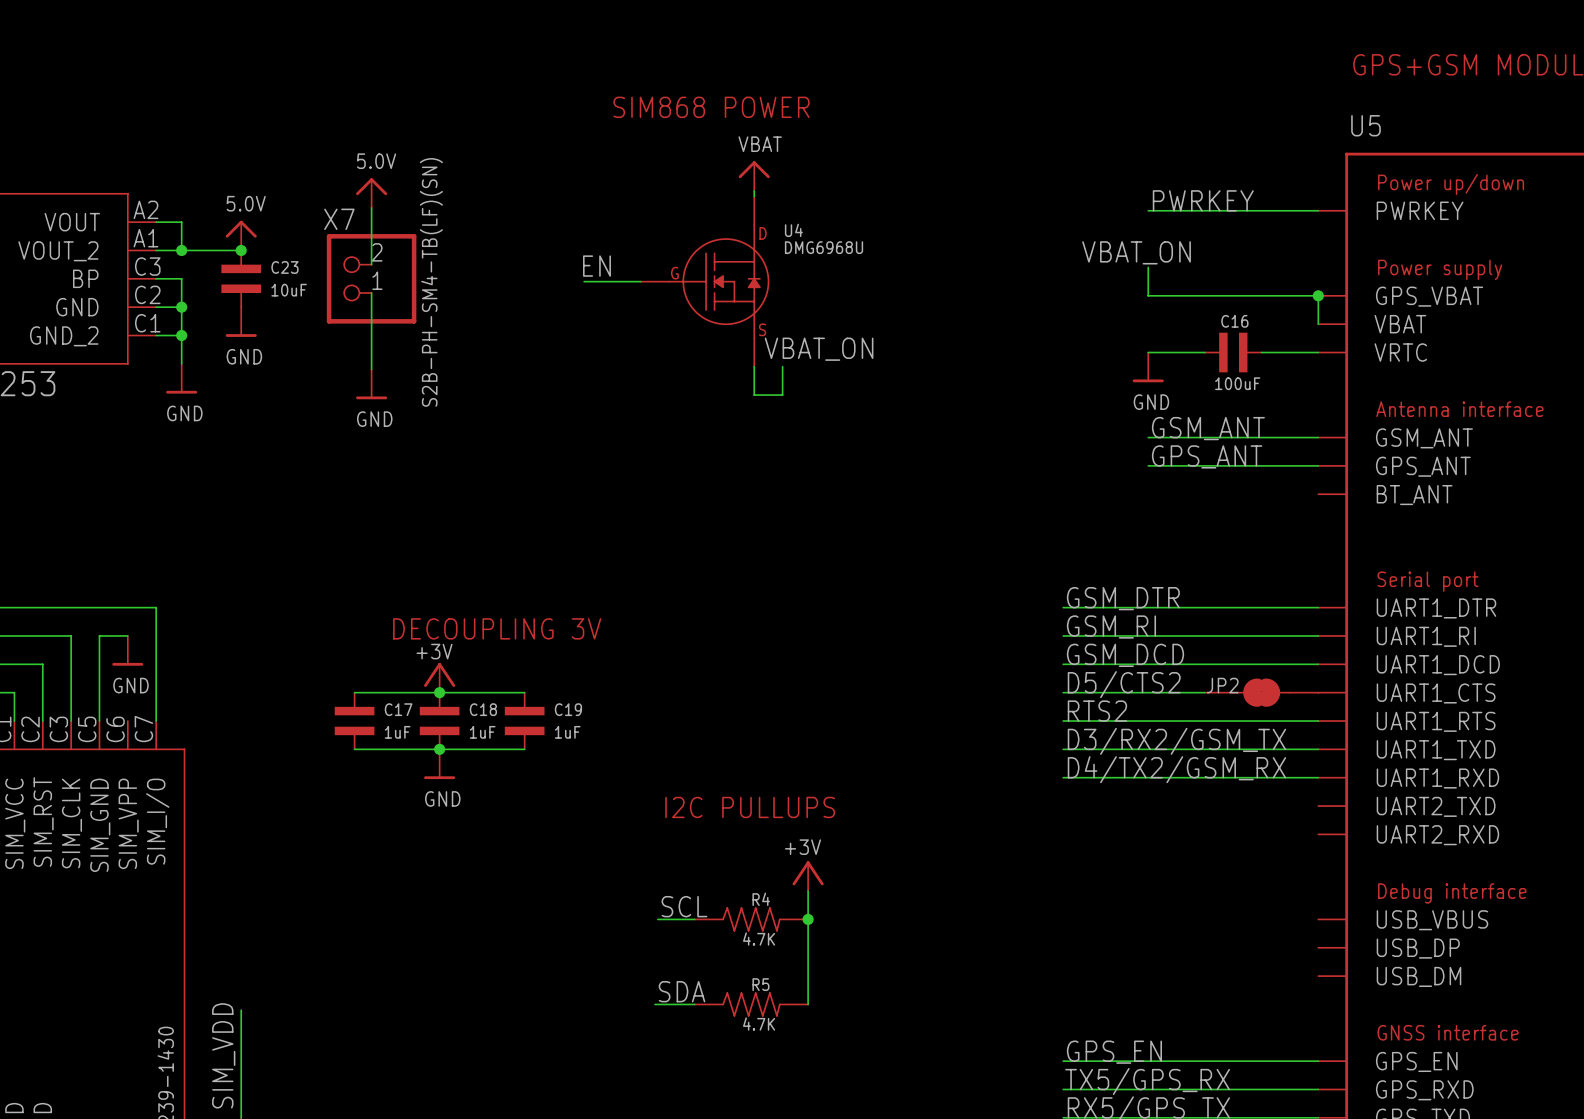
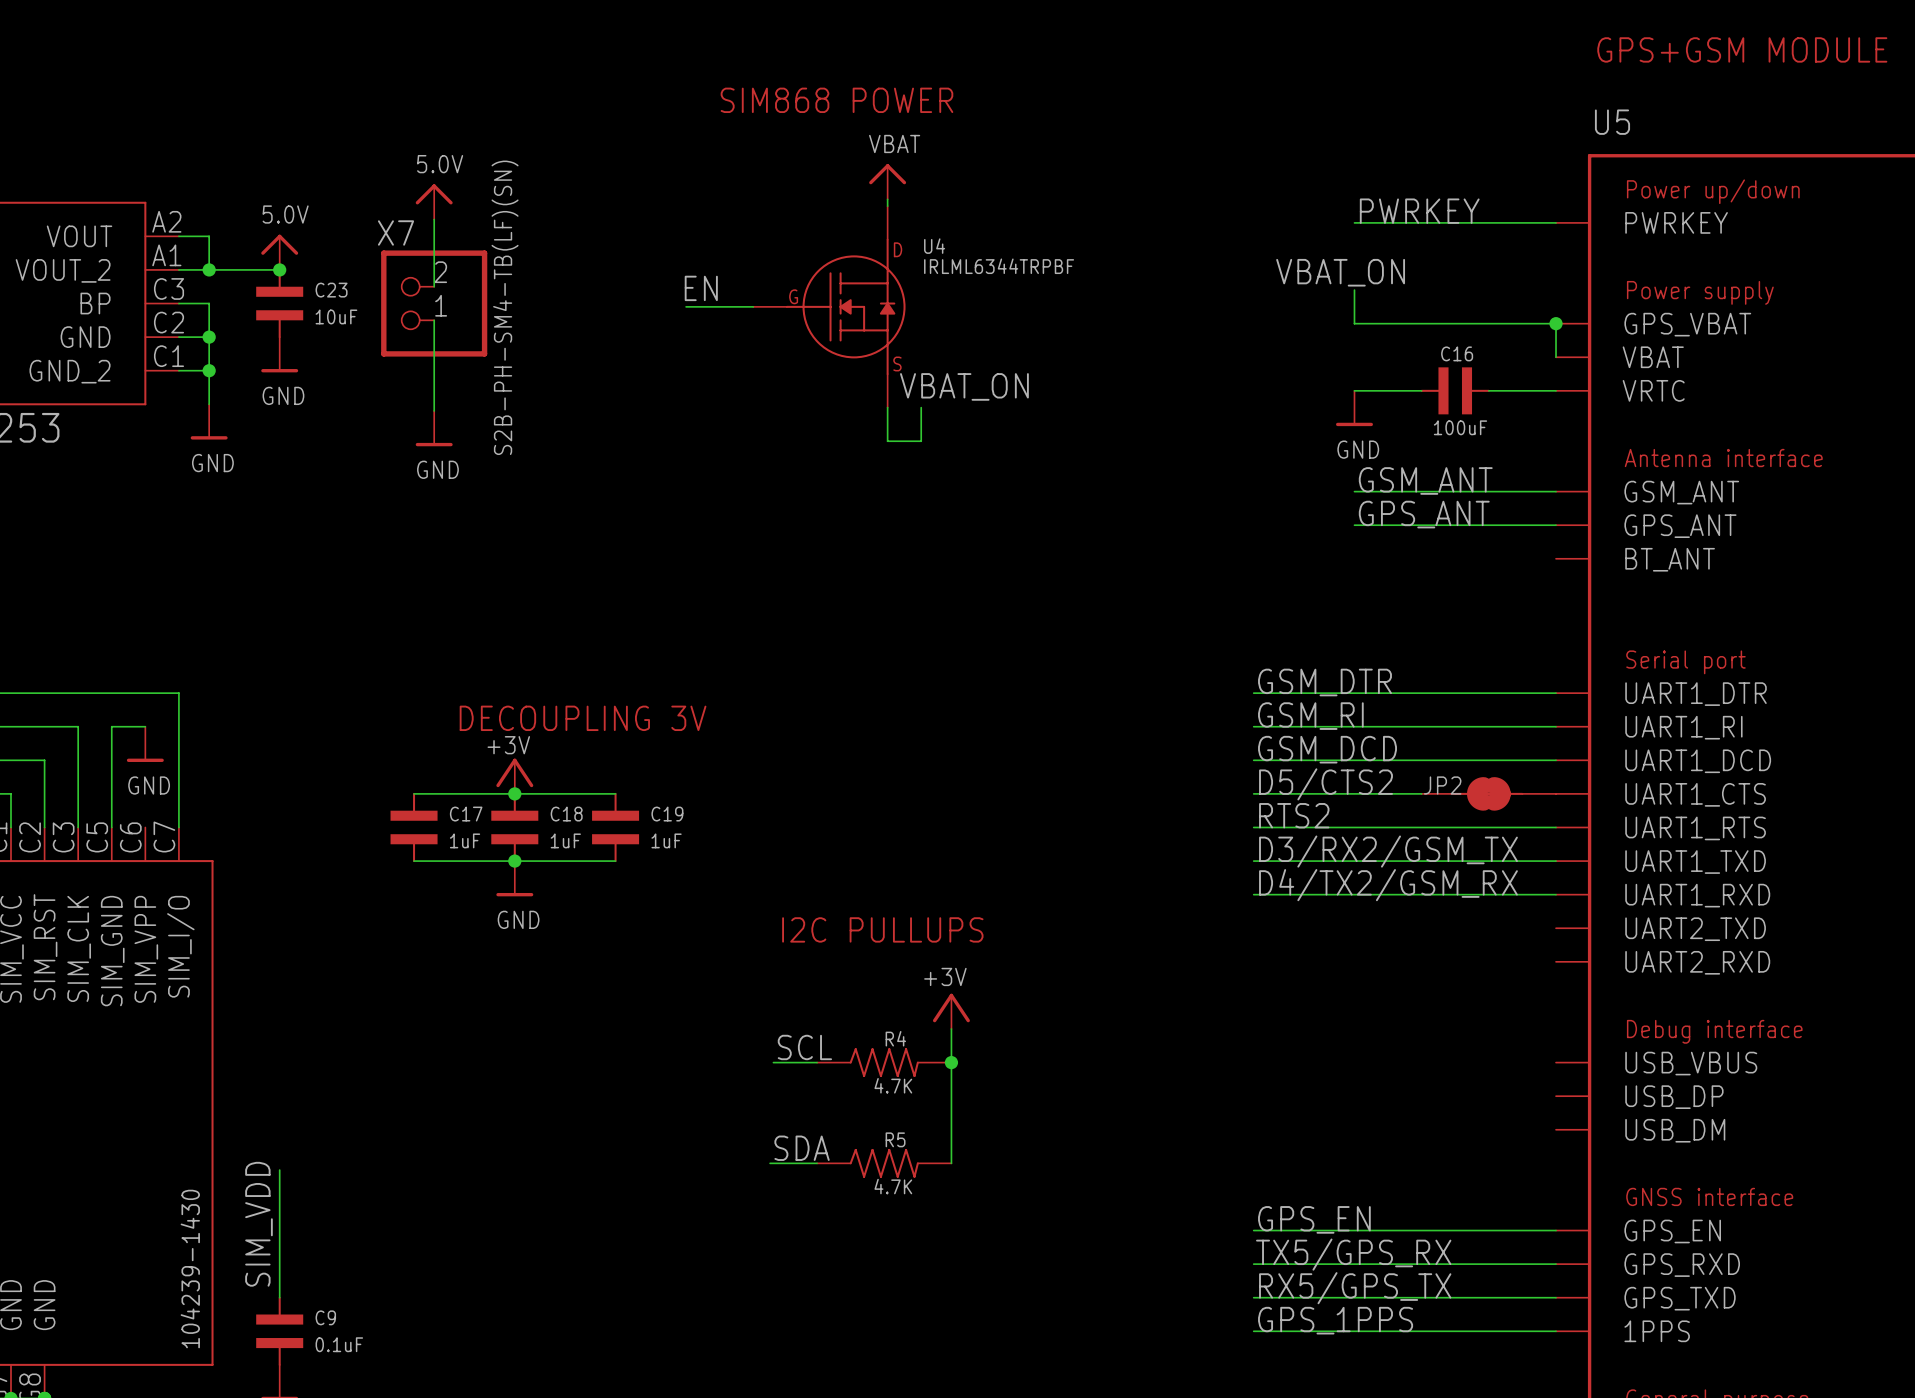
U4 value: DMG6968U (824, 247) -> IRLML6344TRPBF (999, 266)

